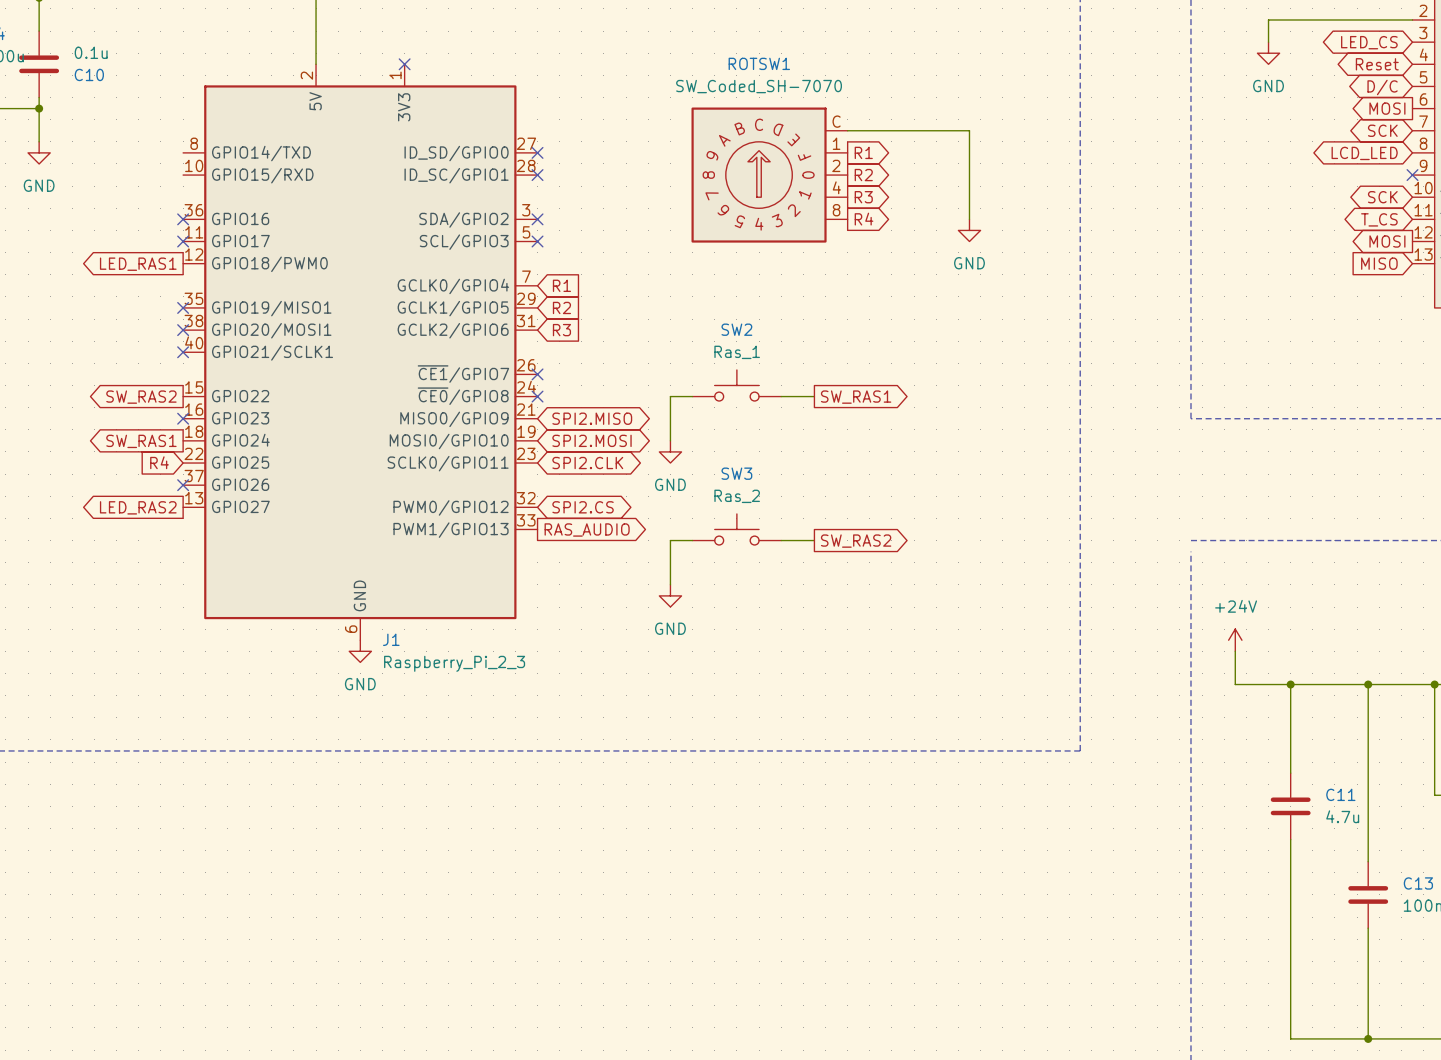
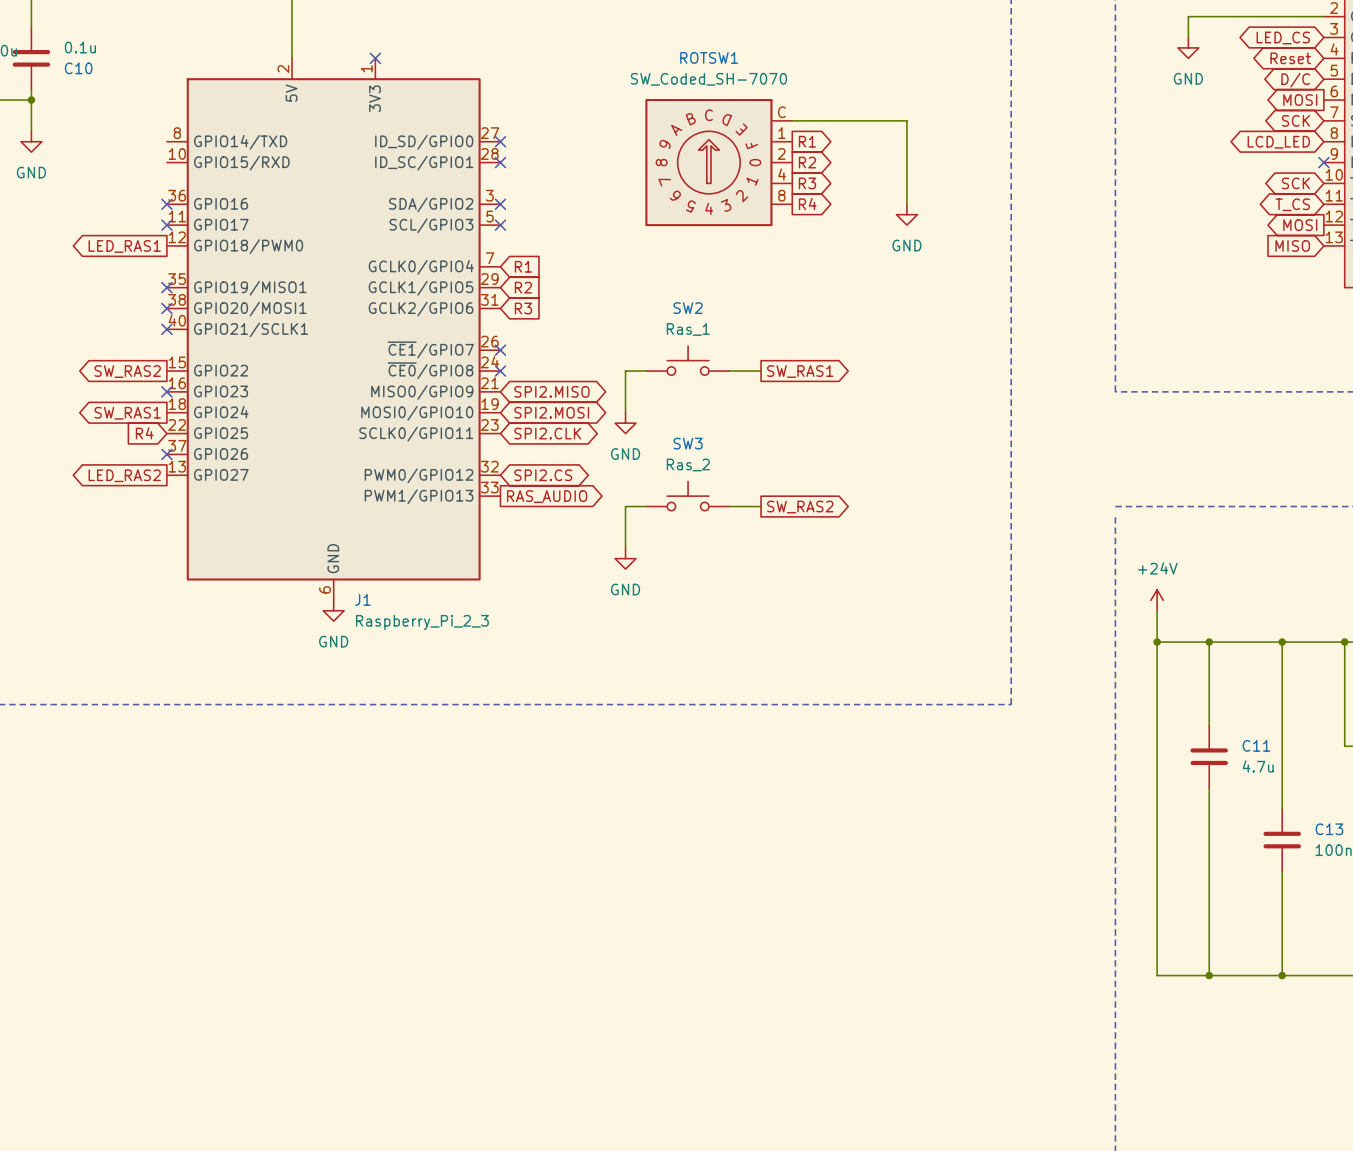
wire: none -> (1157, 642) (1157, 975) (1209, 975)
junction: none -> (1157, 642)
junction: none -> (1209, 975)

